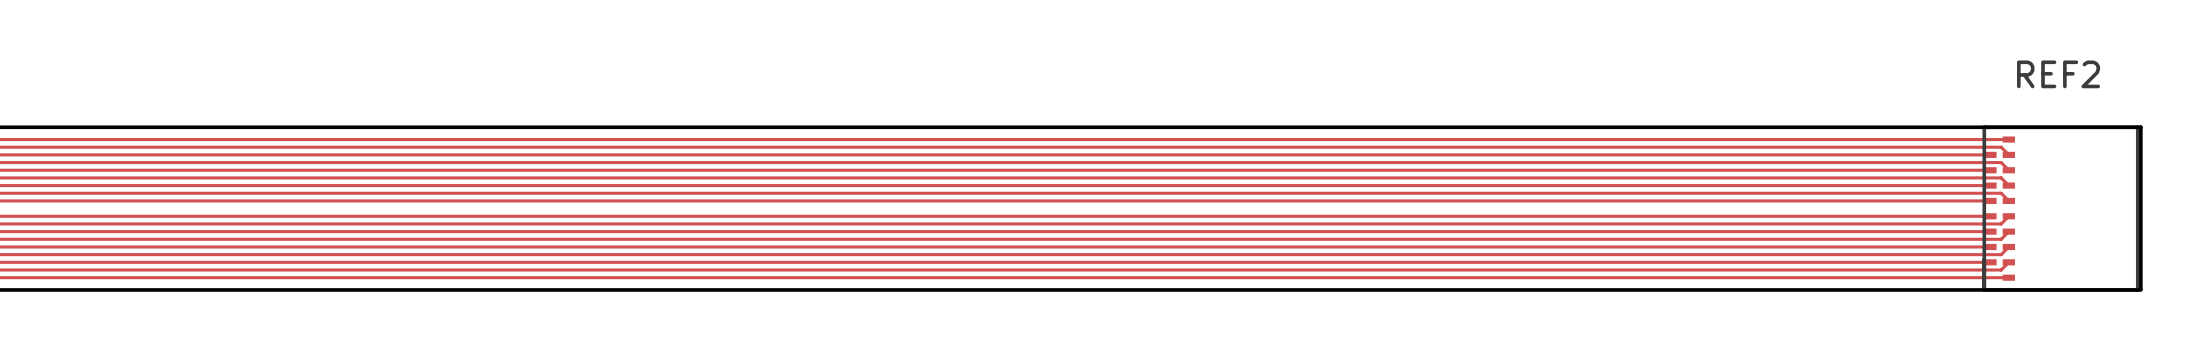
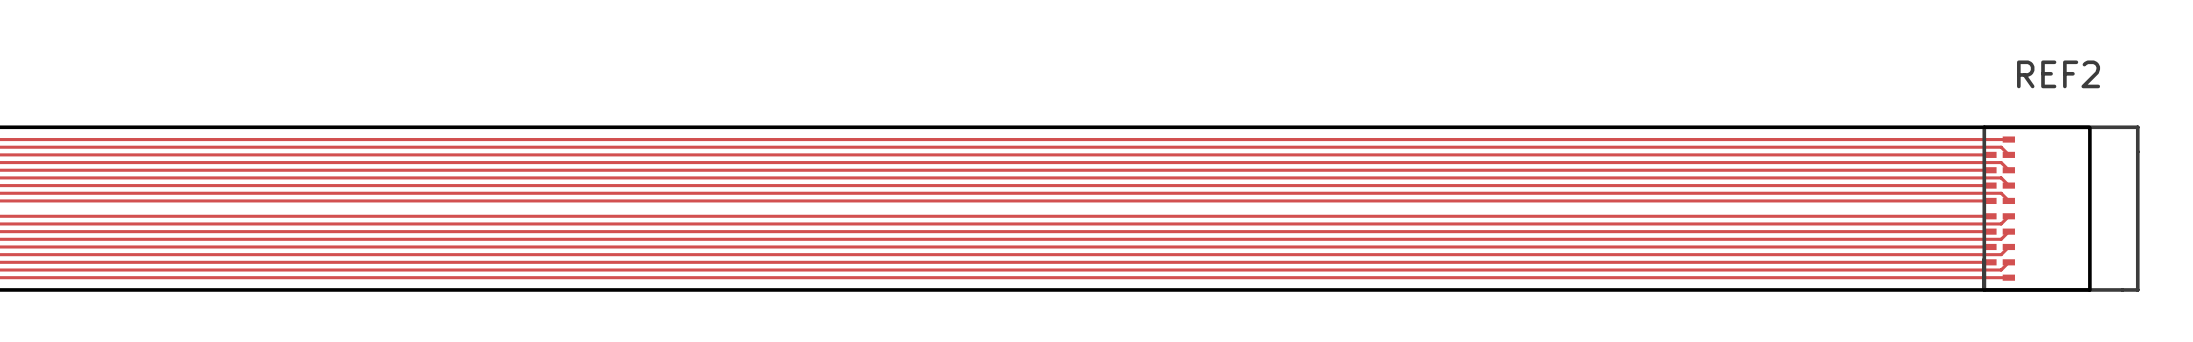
board edge: (2089, 127) (2140, 127) (2140, 288) -> (2089, 127) (2089, 289)
board edge: (2089, 289) (2140, 289) -> none

